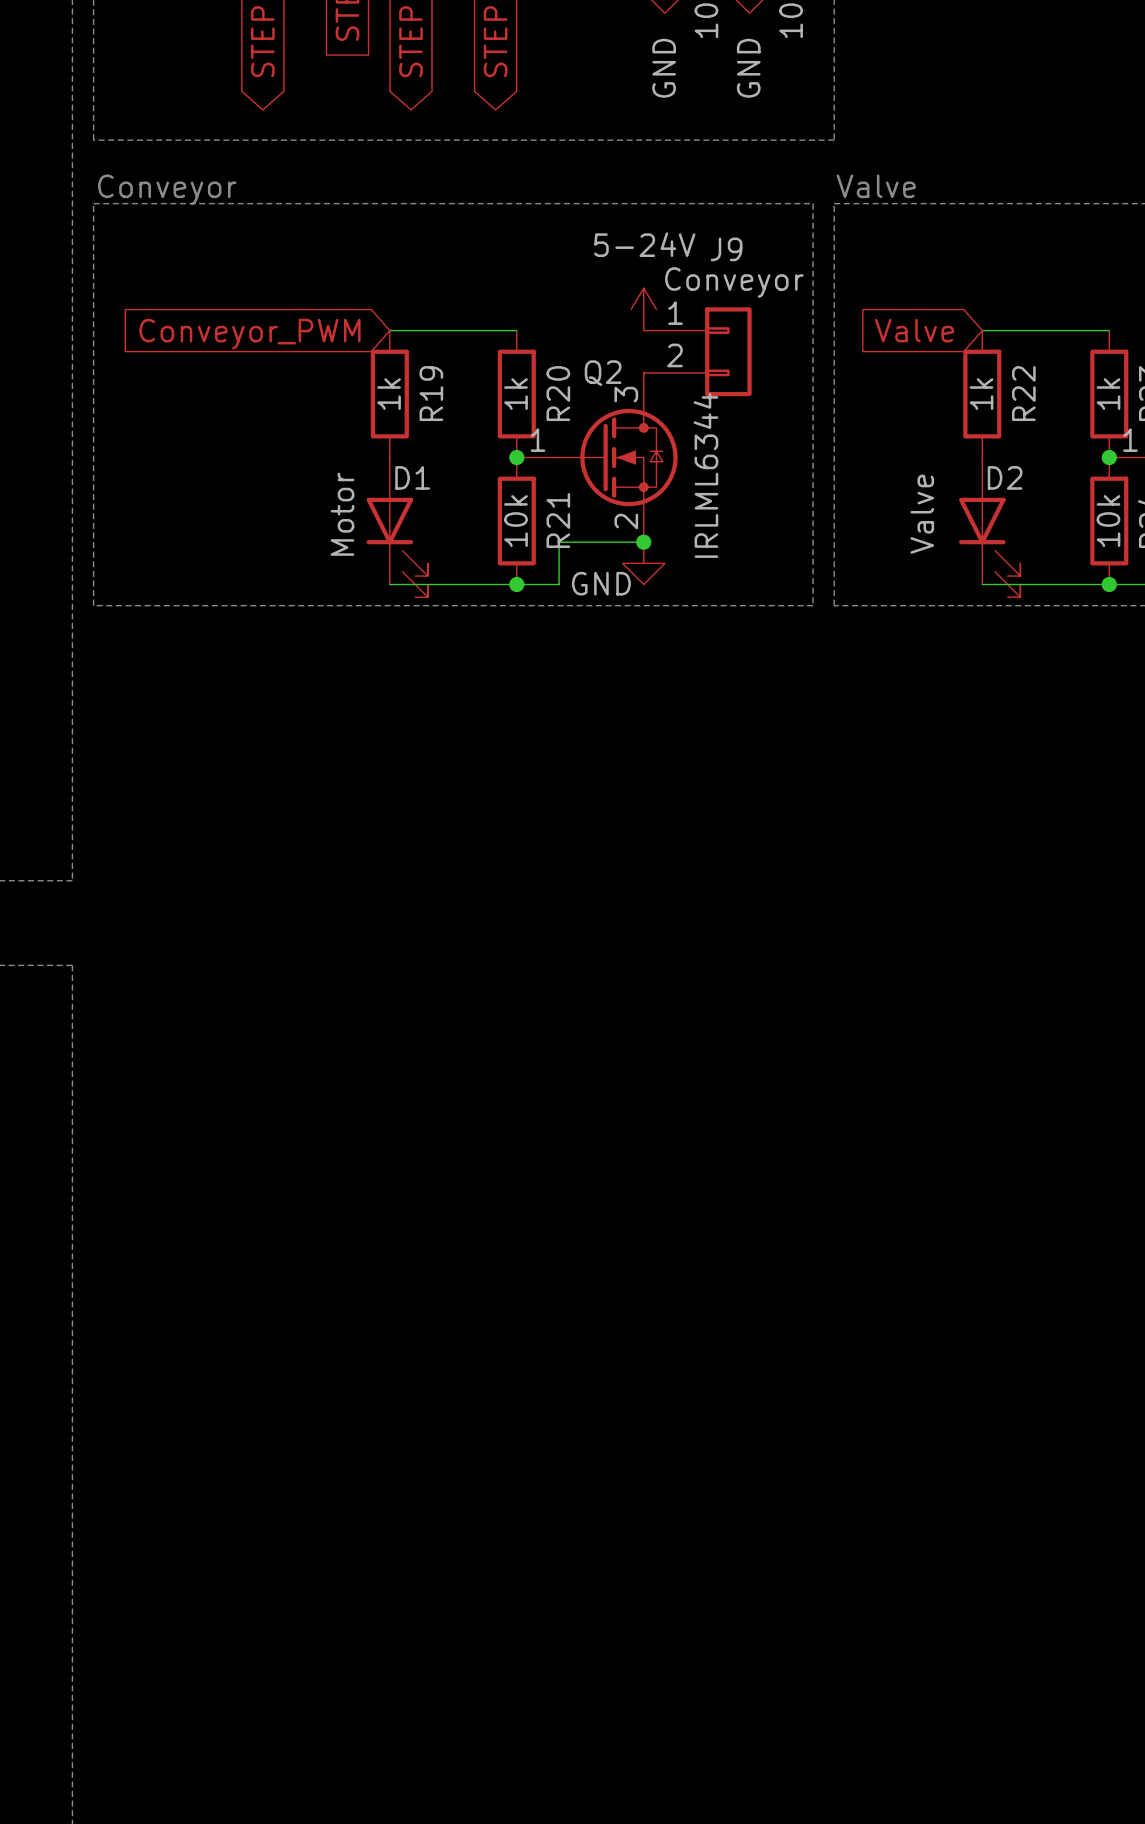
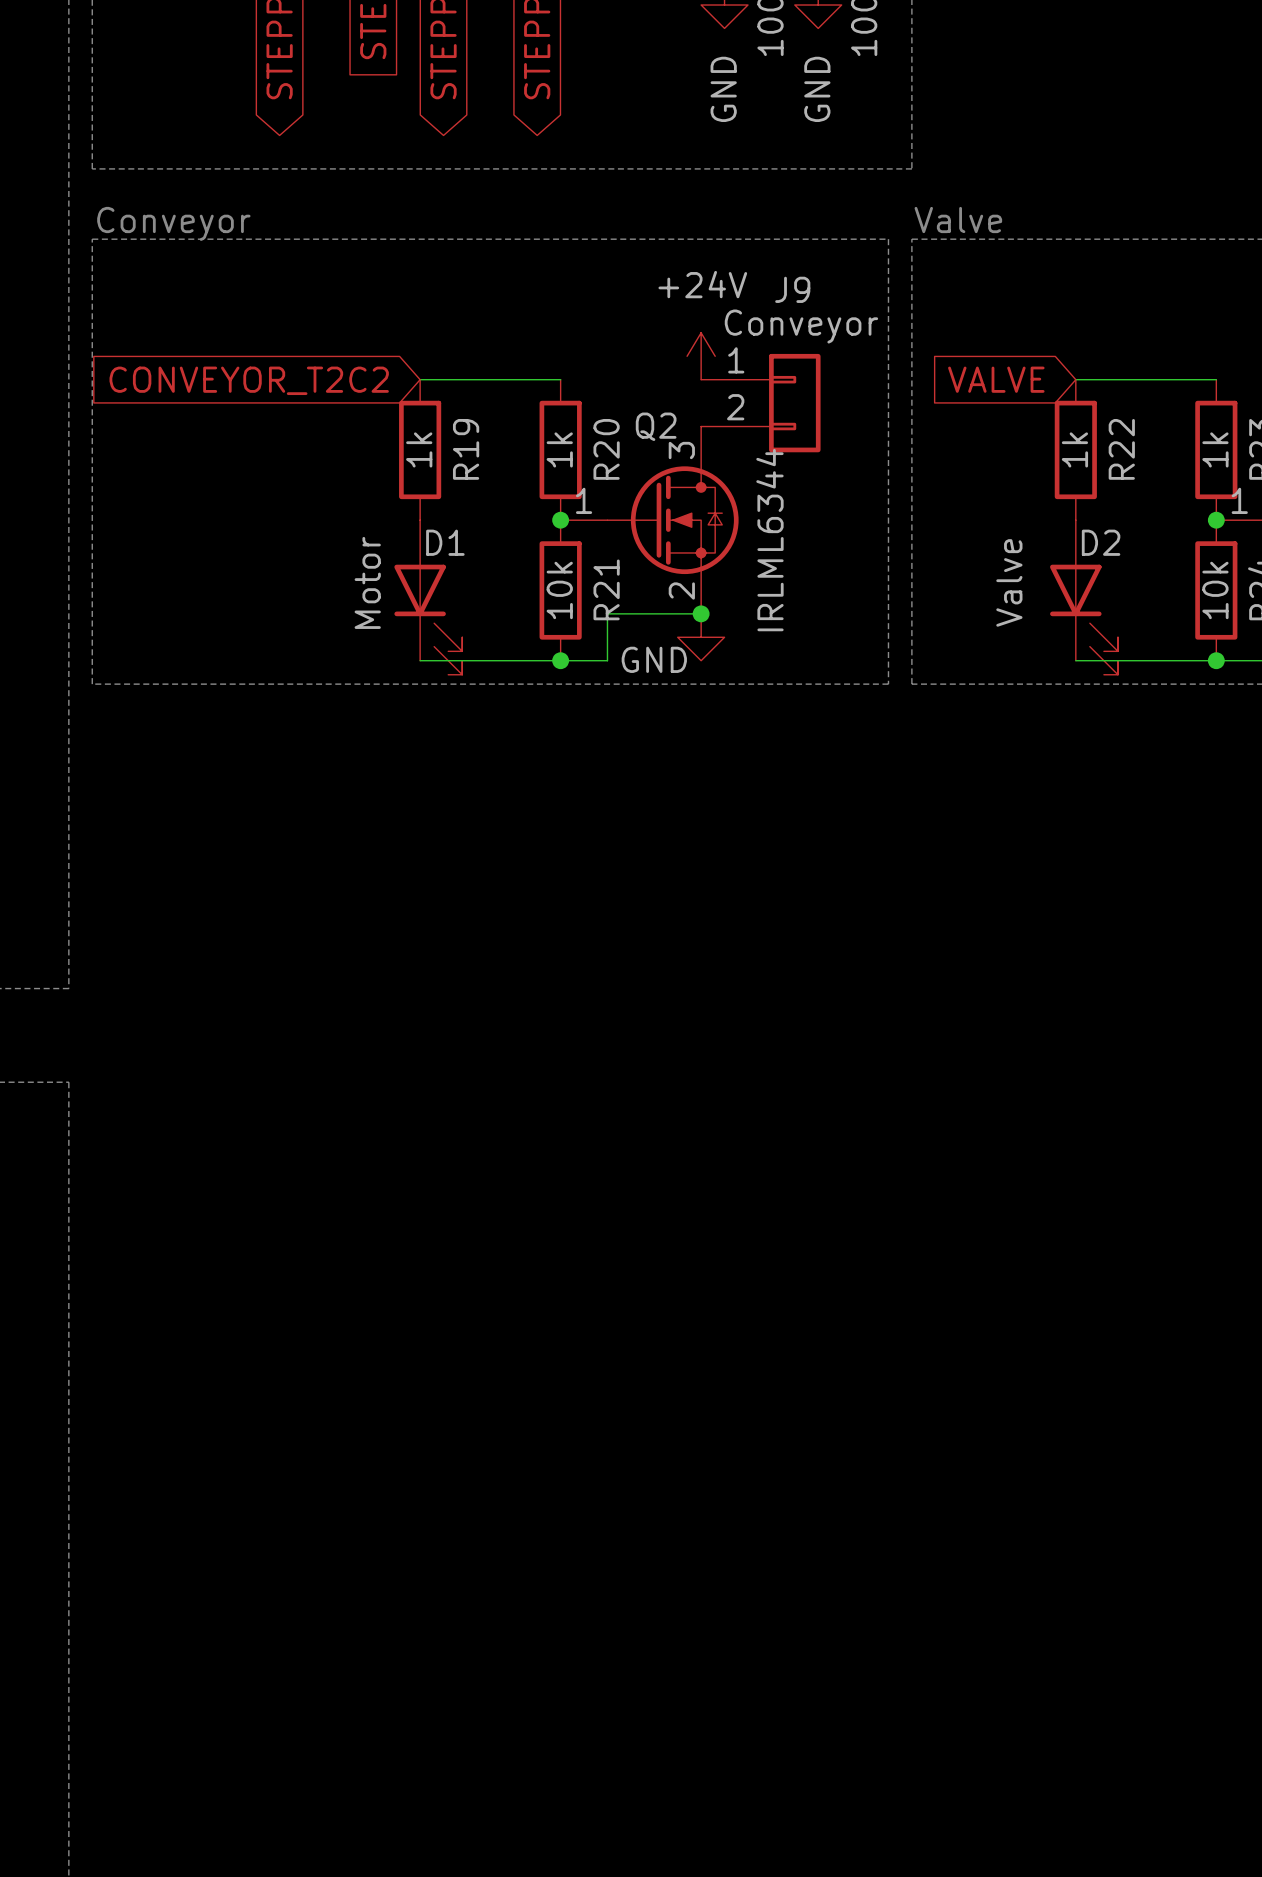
power symbol: 5-24V (643, 309) -> +24V (701, 356)
global label: Valve (914, 330) -> VALVE (996, 379)
global label: Conveyor_PWM (249, 334) -> CONVEYOR_T2C2 (249, 380)

